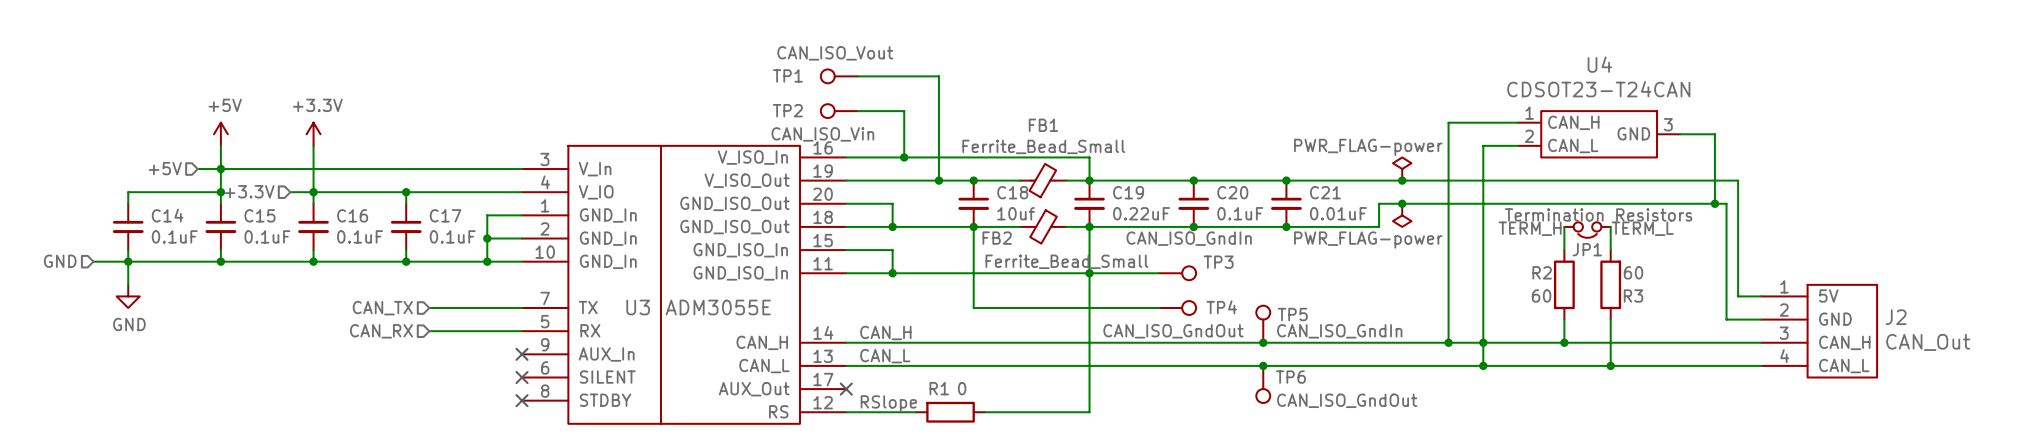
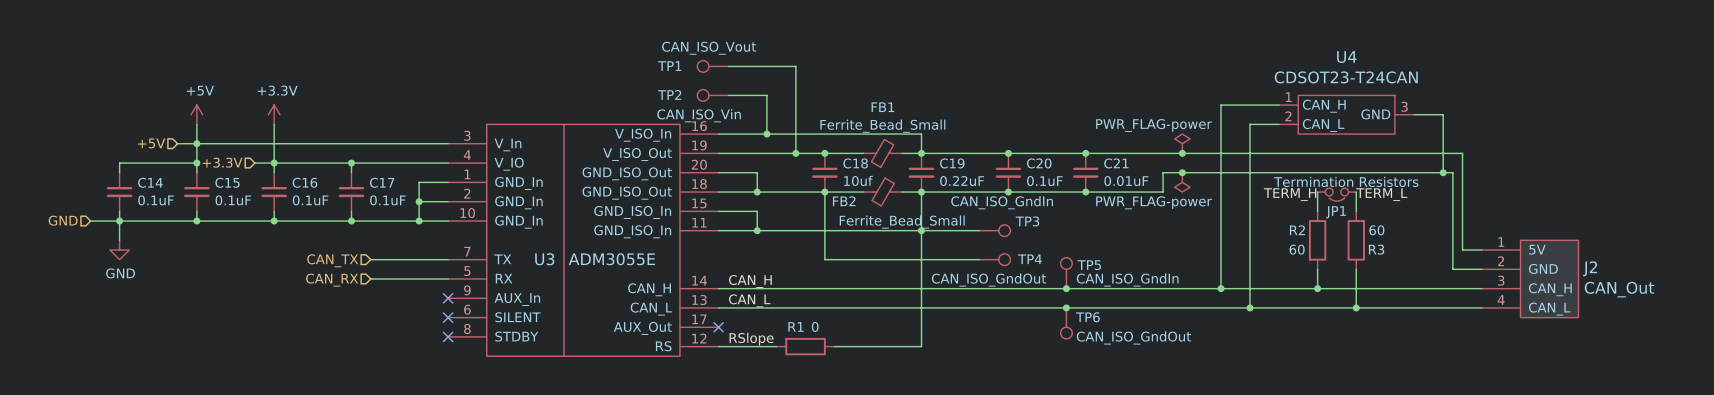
junction: (1483, 342) -> none

